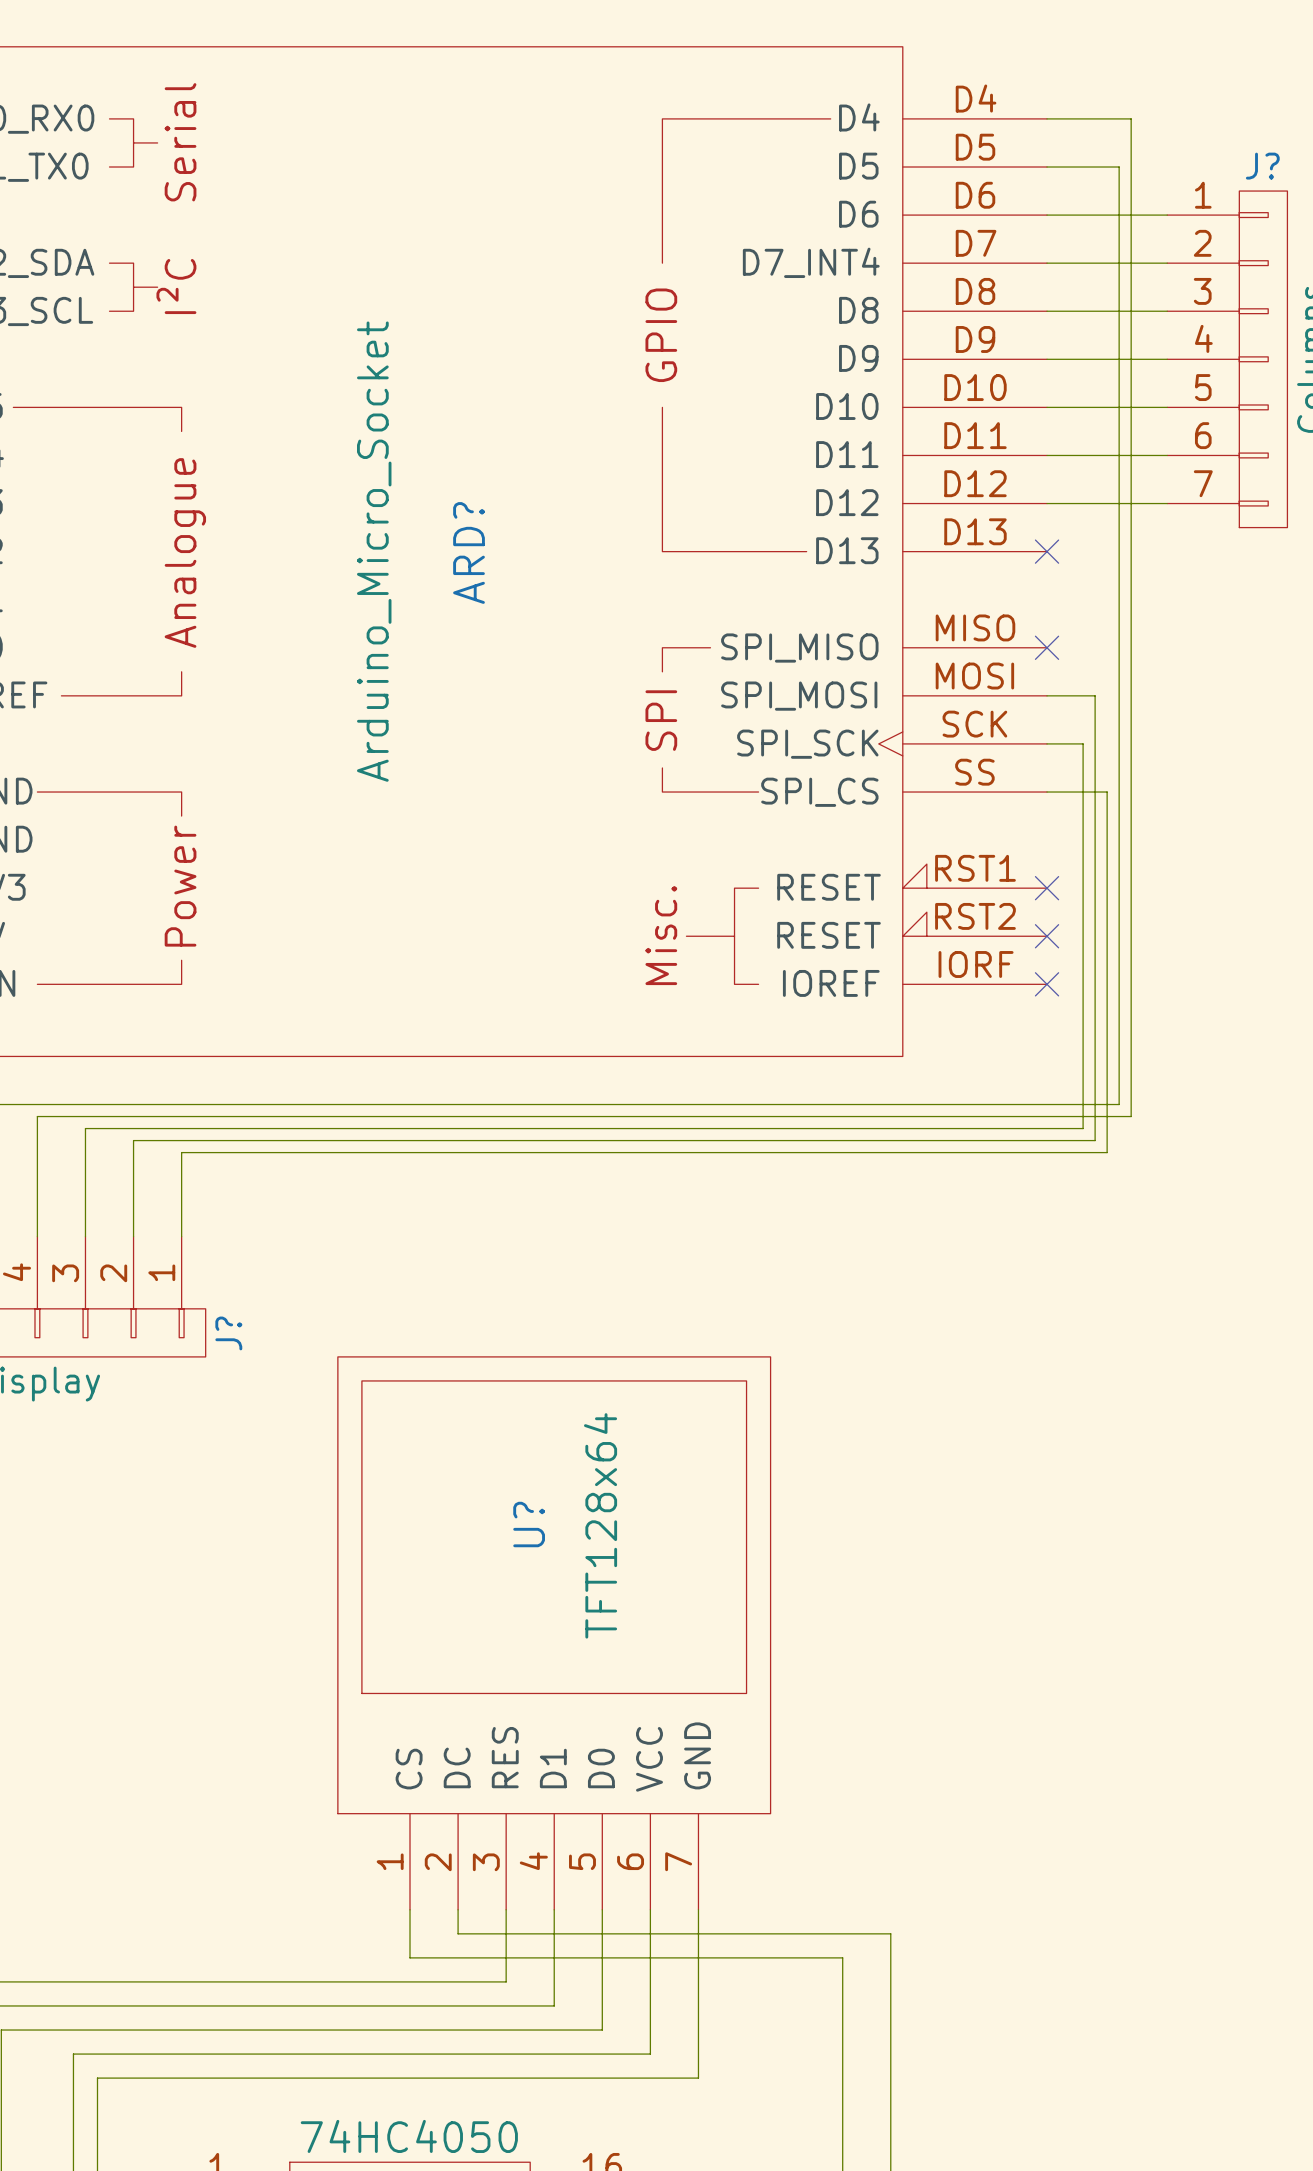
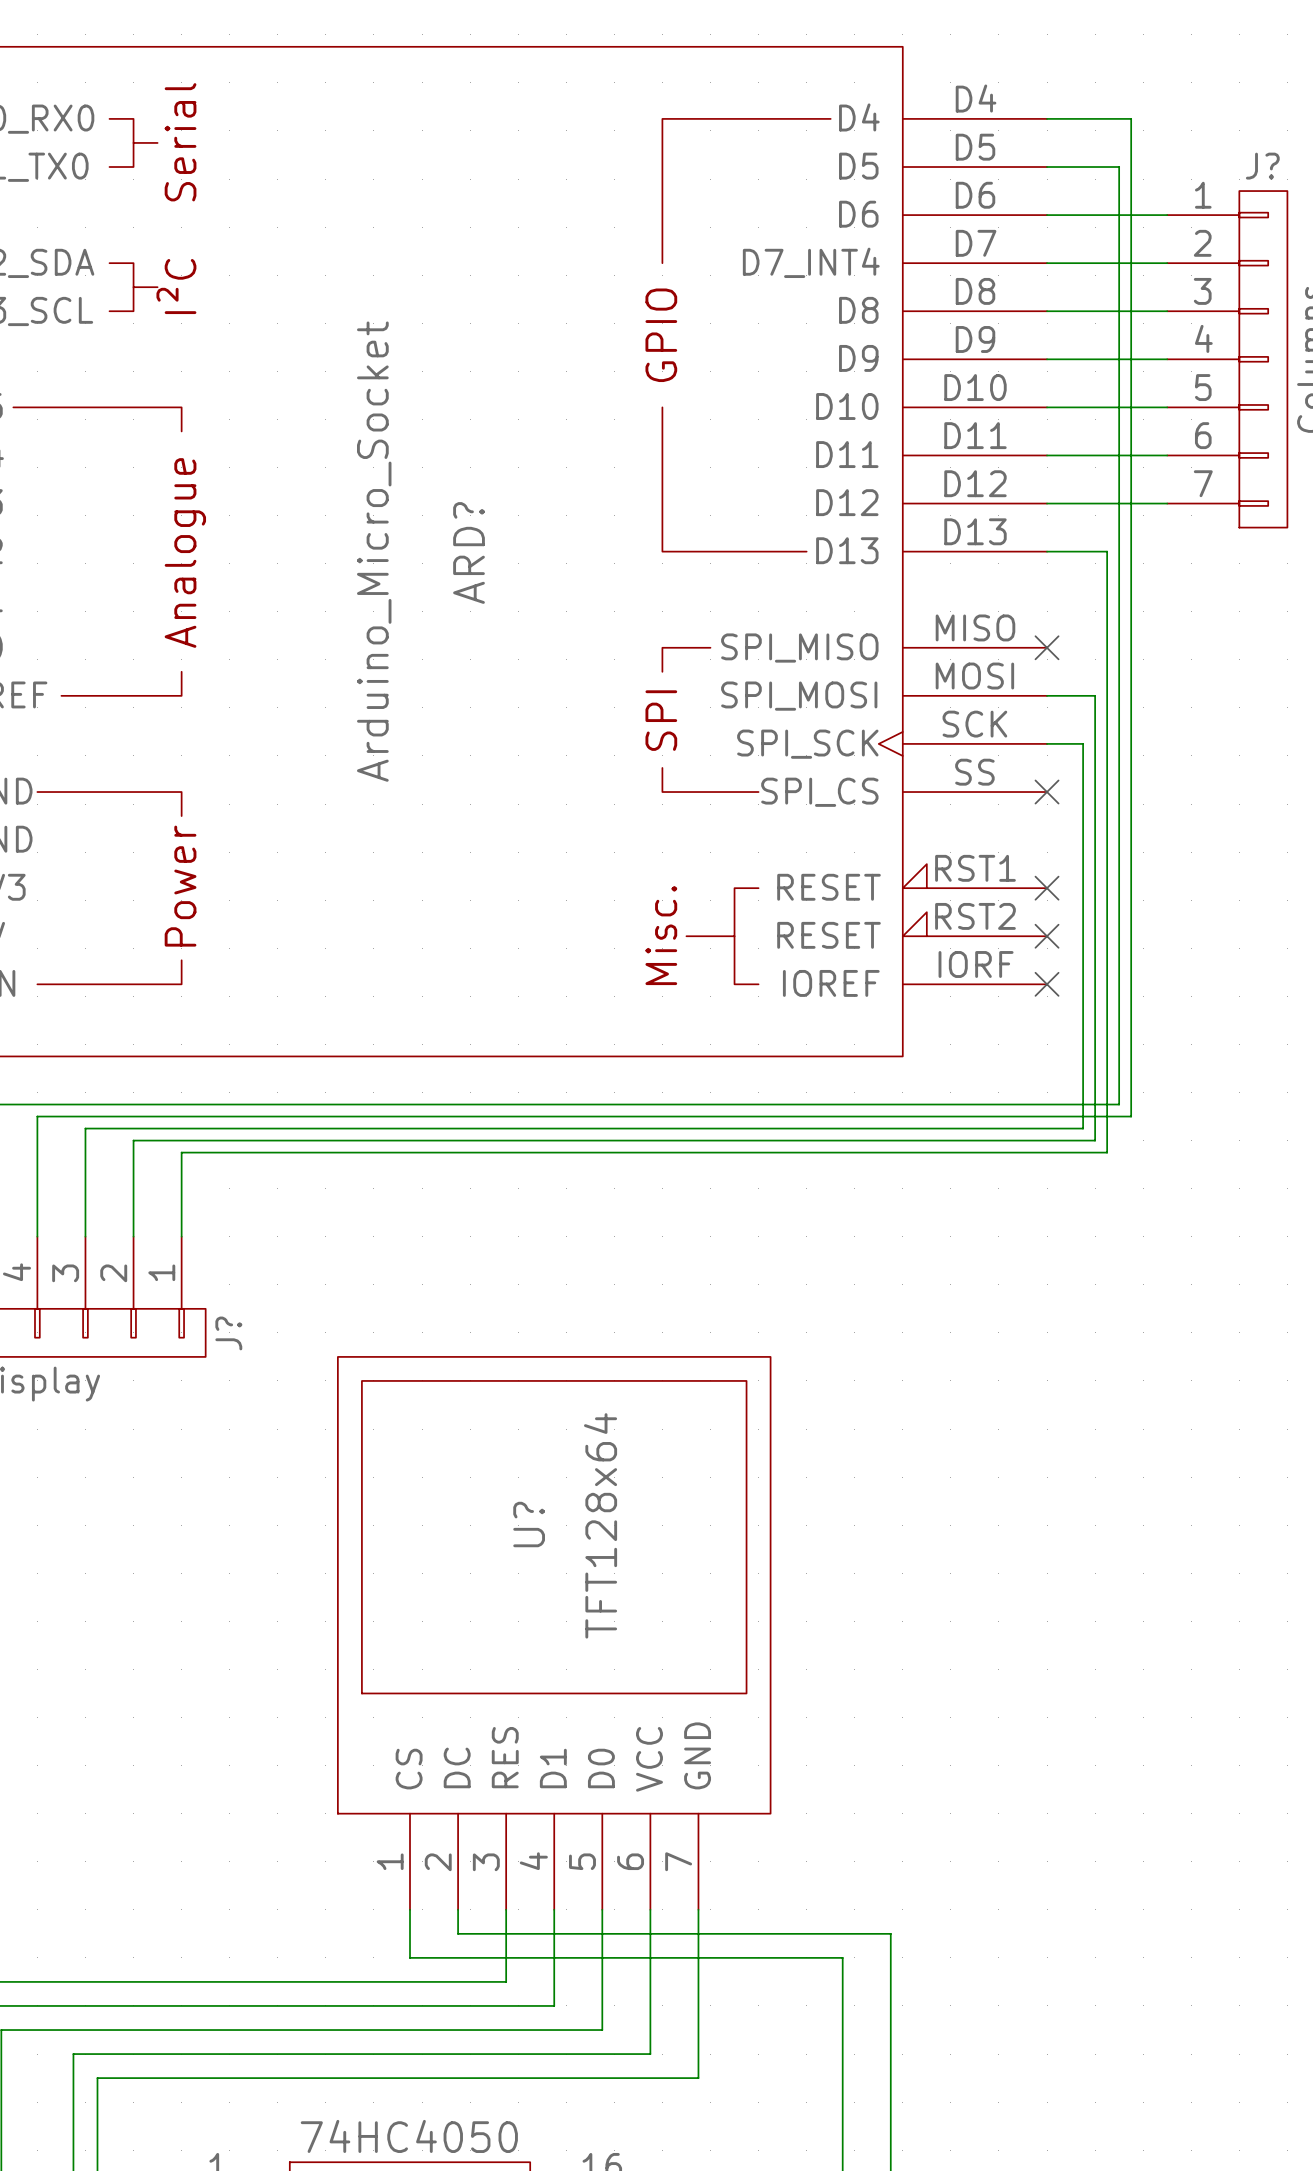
no-connect mark: (1047, 551) -> none
wire: (1047, 792) (1107, 792) -> (1047, 551) (1107, 551) (1107, 792)
no-connect mark: none -> (1047, 792)

